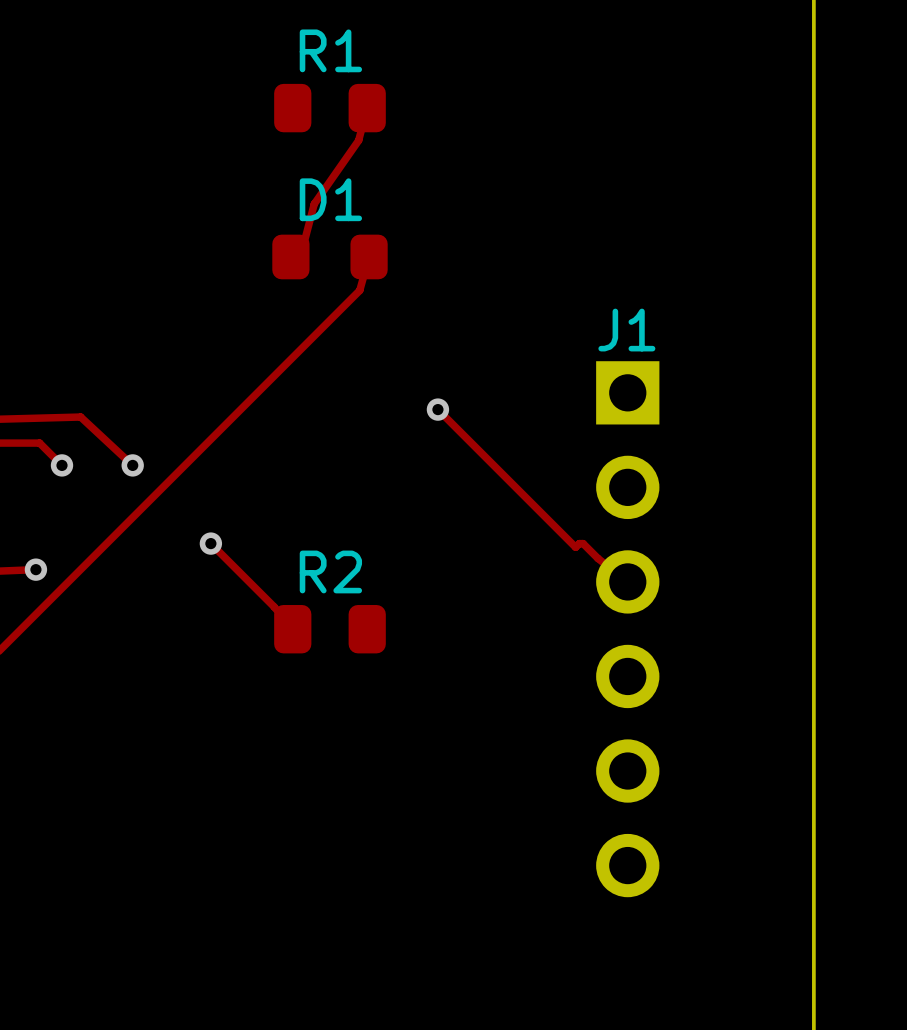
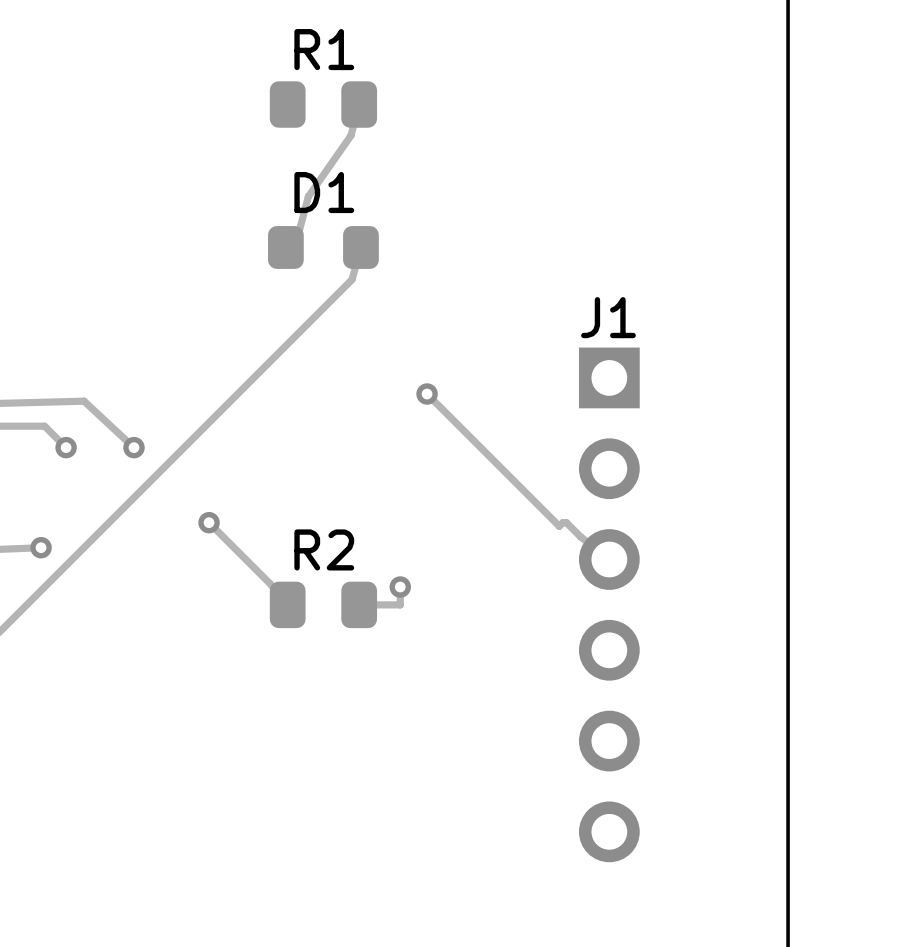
track: none -> (400, 587) (400, 604) (359, 604)
via: none -> (400, 587)

